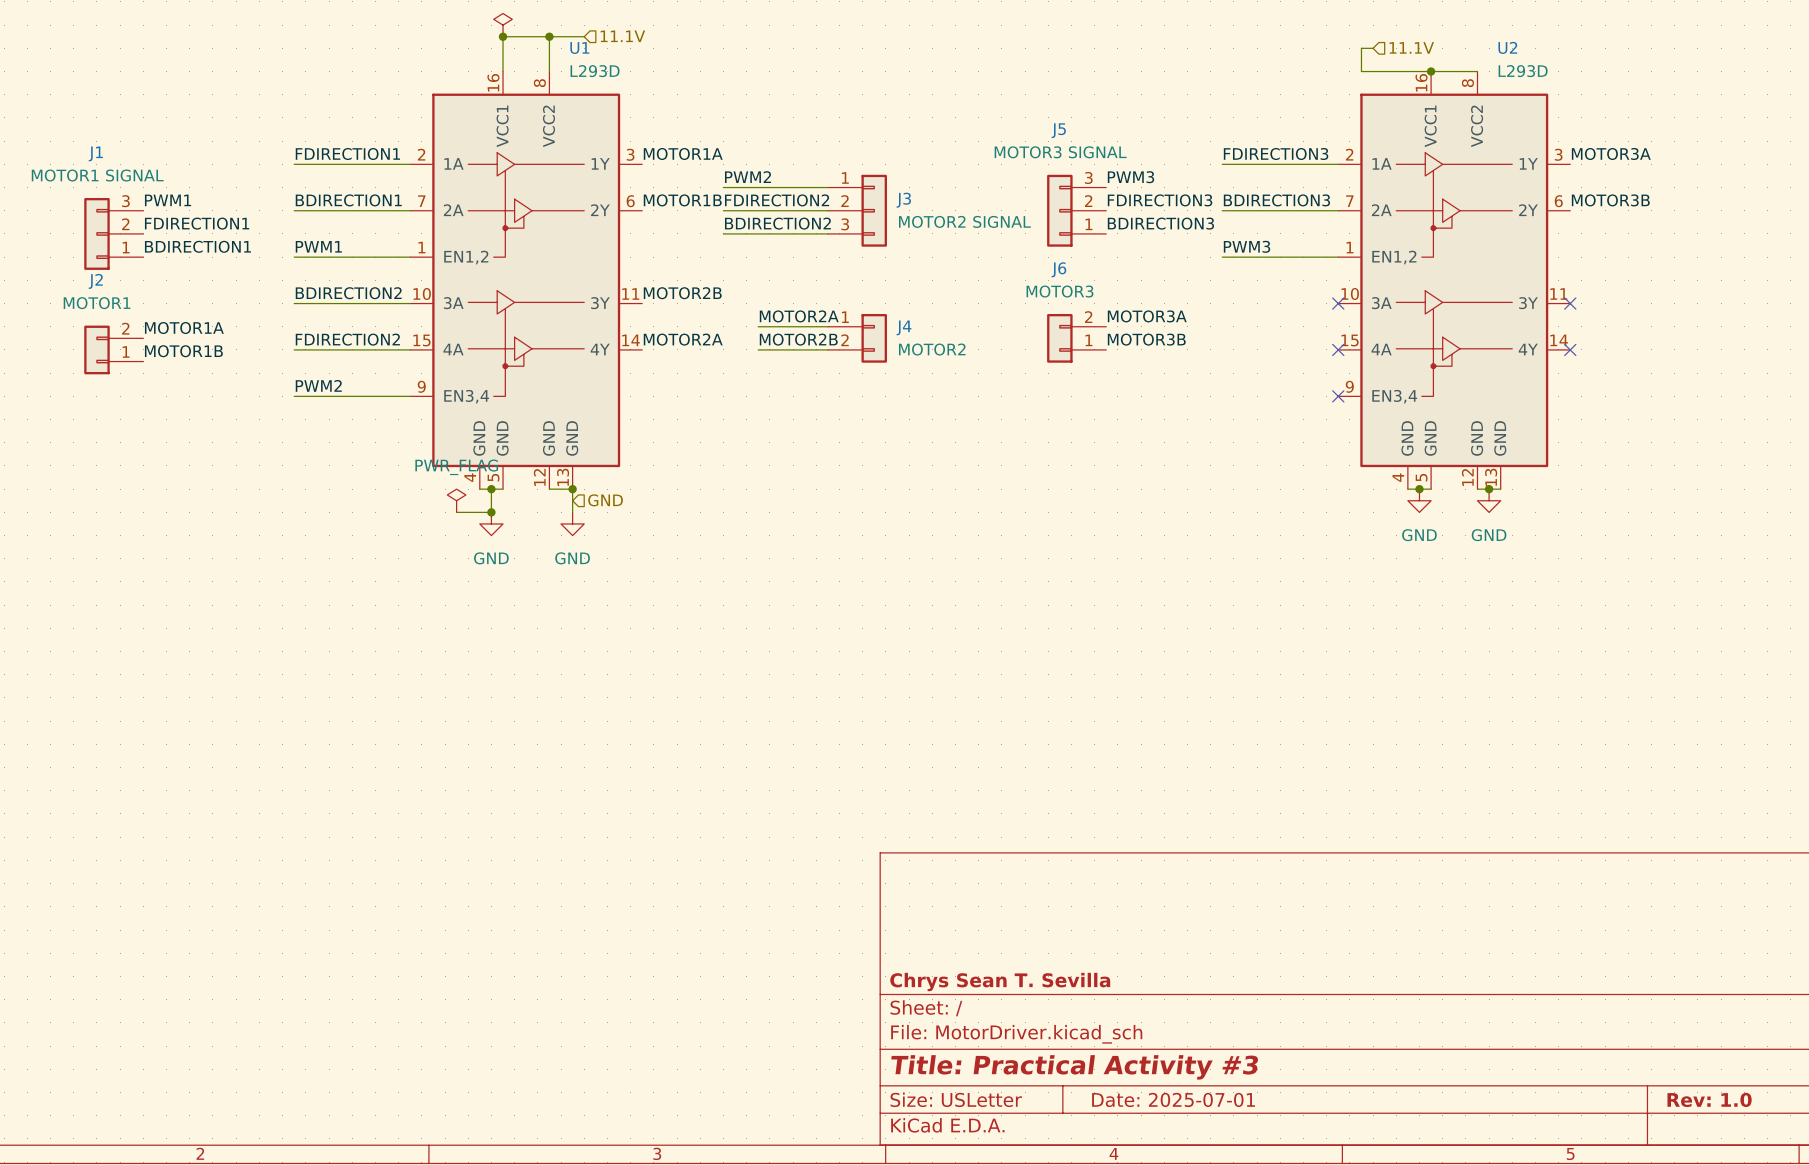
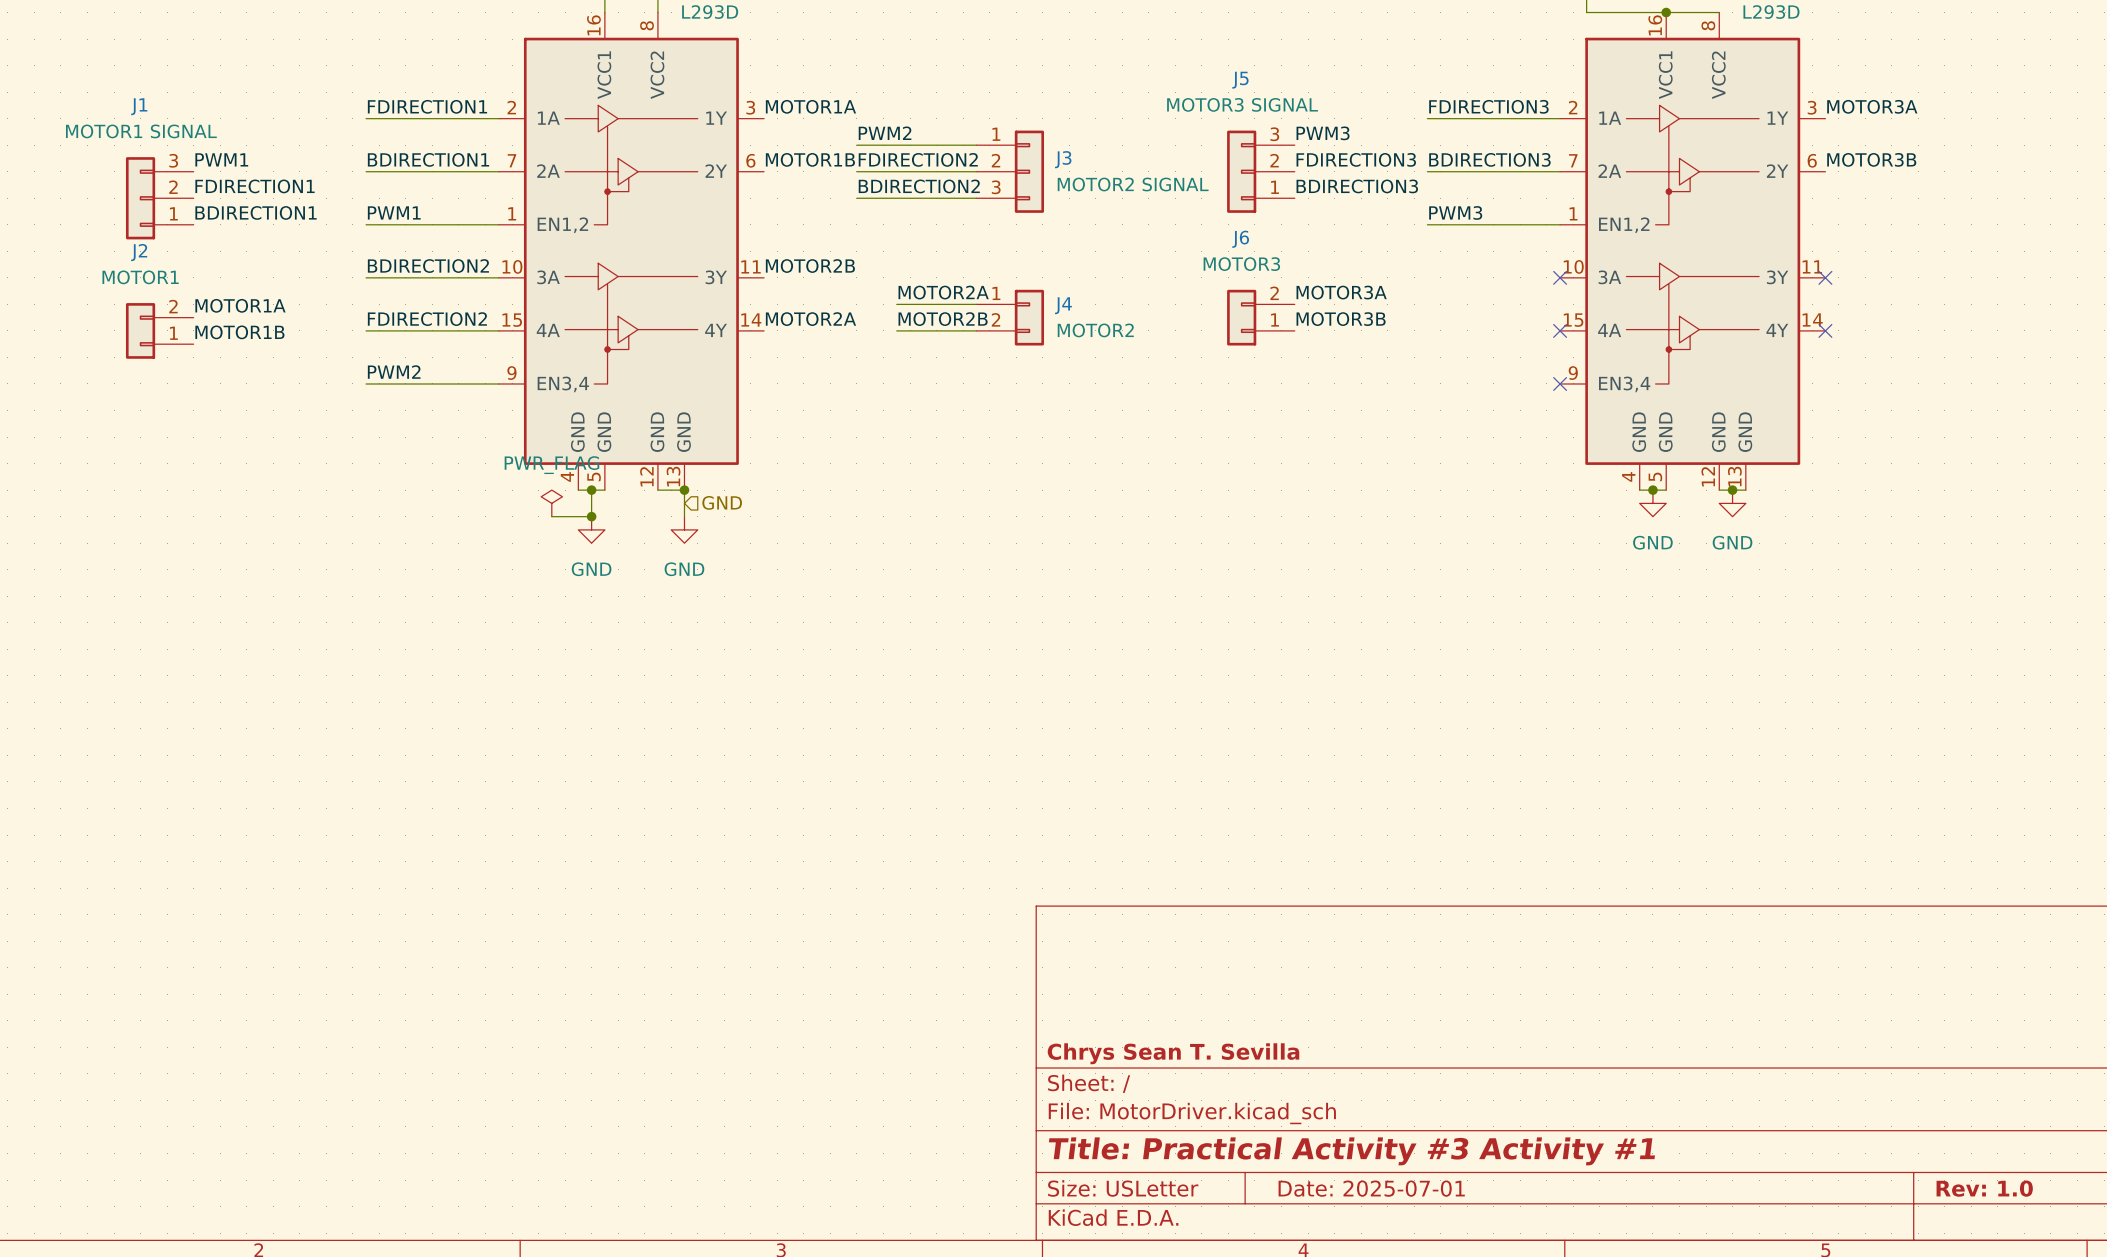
title block: Title: Practical Activity #3 (1074, 1067) -> Title: Practical Activity #3 Activity #1 (1351, 1151)

